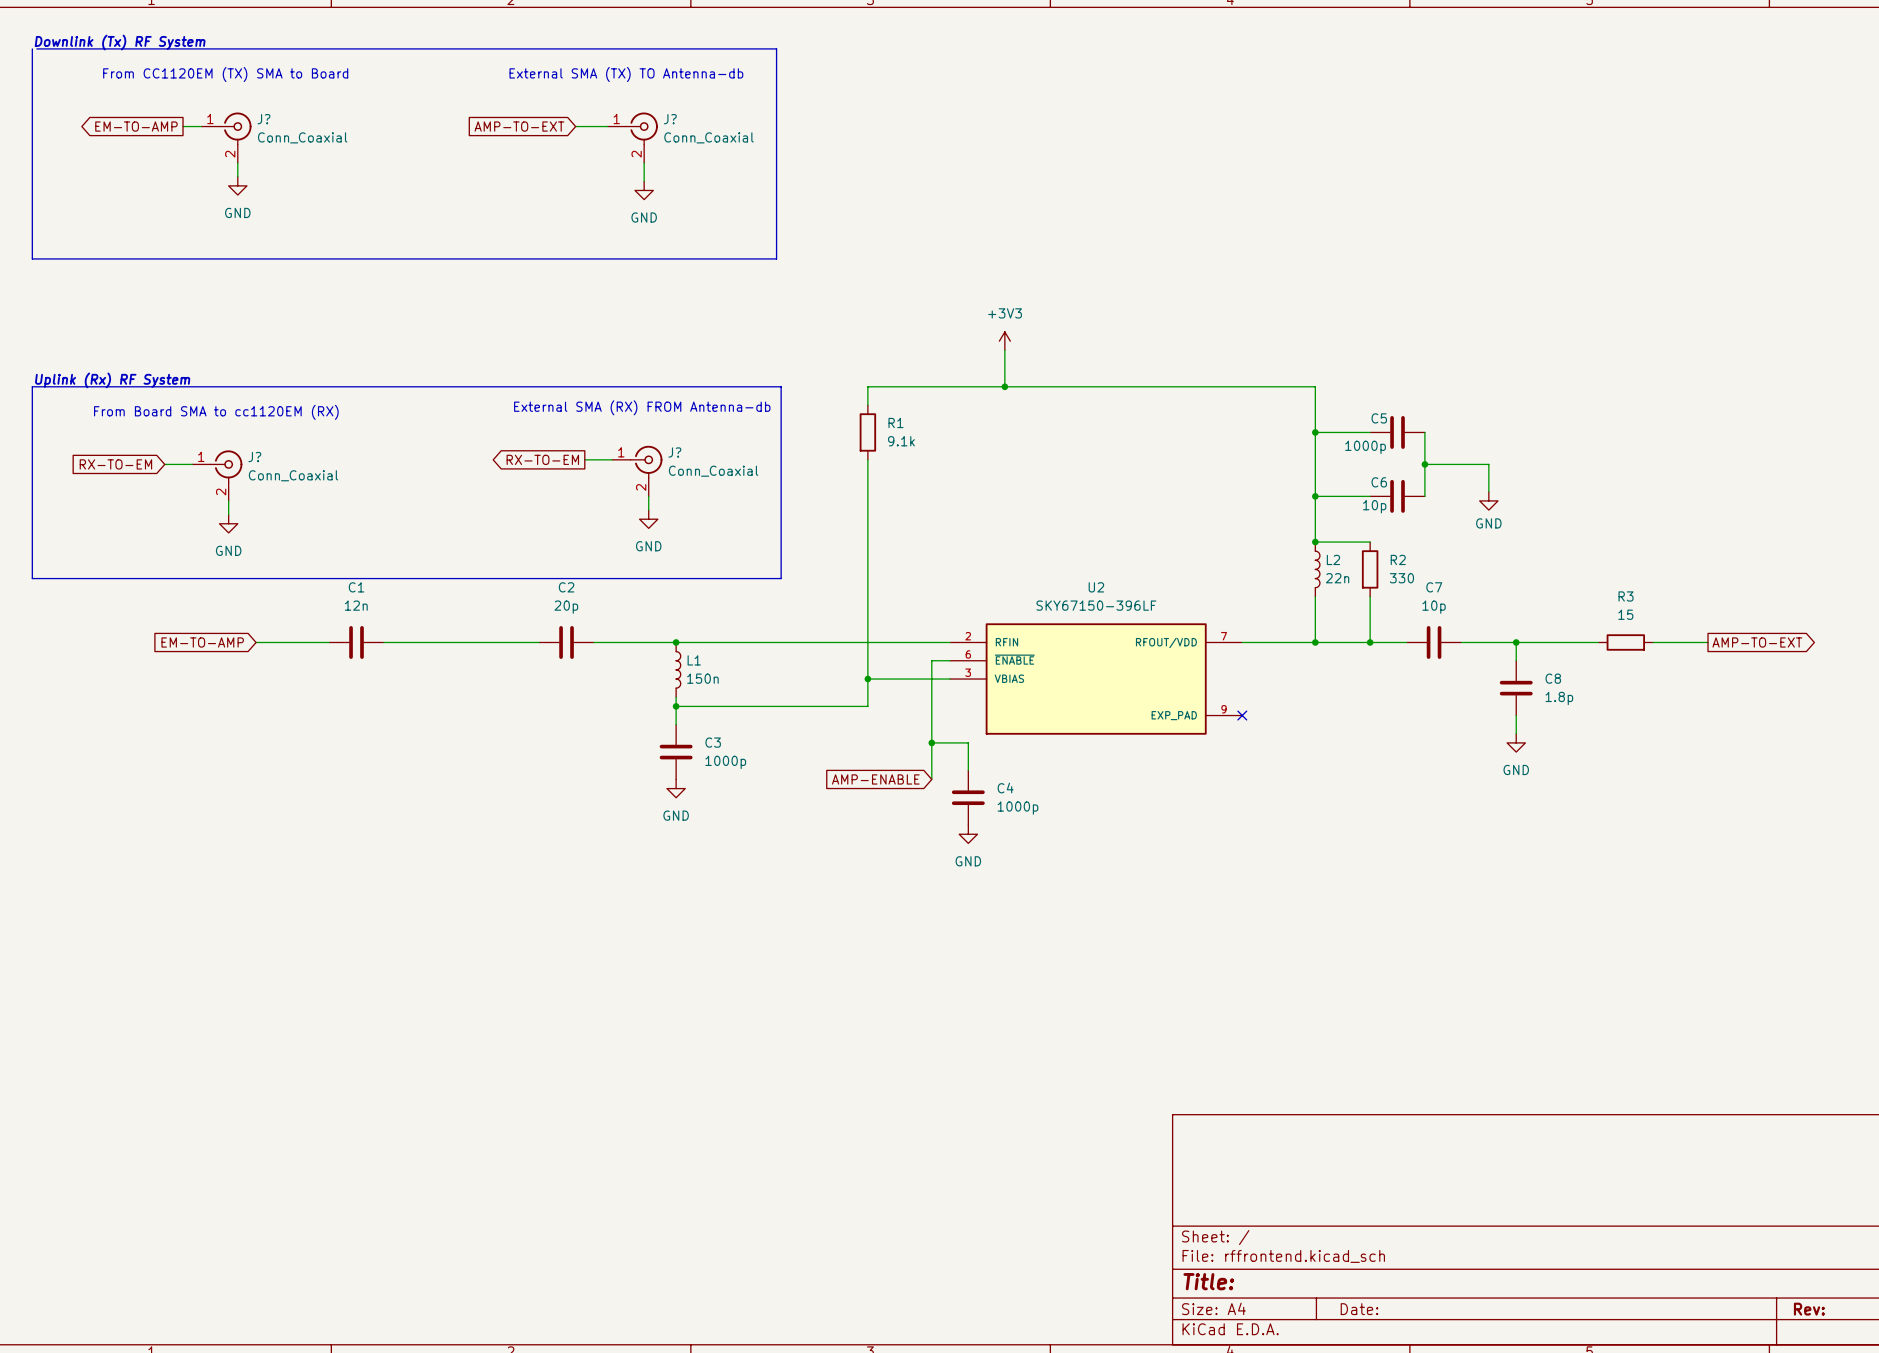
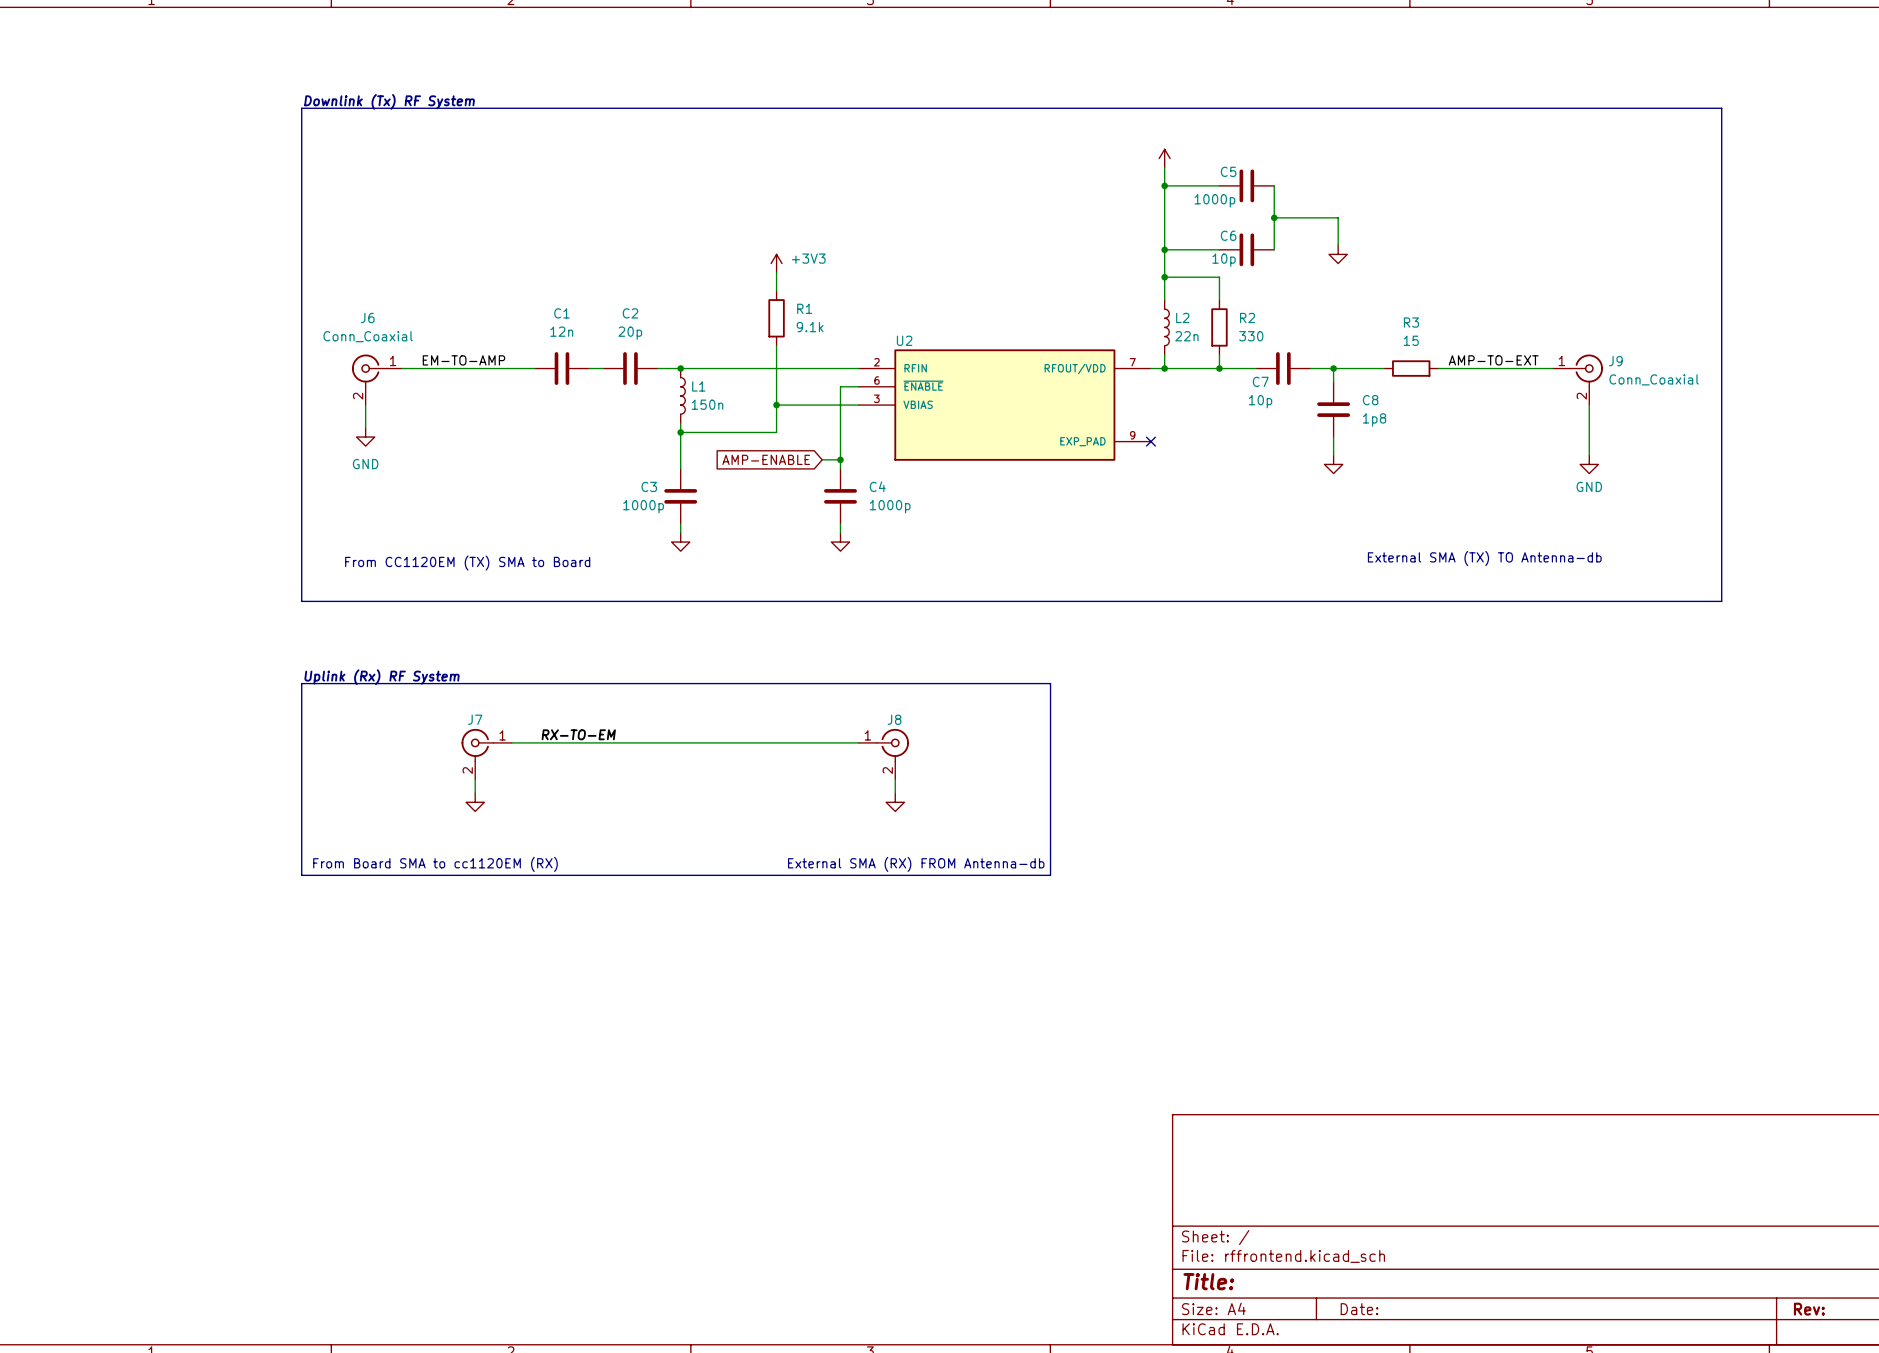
text: Downlink (Tx) RF System (120, 42) -> none
line: (32, 48) (32, 258) (776, 258) (776, 48) (36, 48) -> none
text: From CC1120EM (TX) SMA to Board (225, 74) -> none
text: External SMA (TX) TO Antenna-db (626, 74) -> none
text: none -> Downlink (Tx) RF System (389, 101)
line: none -> (301, 108) (1721, 108) (1721, 601) (301, 601) (301, 108)
global label: EM-TO-AMP (136, 126) -> none
wire: (183, 126) (201, 126) -> none
global label: AMP-TO-EXT (519, 126) -> none
wire: (575, 126) (607, 126) -> none
J?: Conn_Coaxial (226, 137) -> none
J?: Conn_Coaxial (632, 137) -> none
power symbol: none -> (1164, 158)
wire: (237, 163) (237, 176) -> none
wire: (644, 163) (644, 181) -> (776, 272) (776, 290)
wire: none -> (1164, 167) (1164, 300)
power symbol: GND (237, 185) -> none
wire: none -> (1164, 185) (1219, 185)
junction: none -> (1164, 185)
wire: none -> (1274, 185) (1274, 249)
power symbol: GND (644, 190) -> none
wire: none -> (1274, 217) (1338, 217) (1338, 245)
junction: none -> (1274, 217)
wire: none -> (1164, 249) (1219, 249)
junction: none -> (1164, 249)
power symbol: none -> (1338, 254)
power symbol: none -> +3V3 (776, 263)
wire: none -> (1164, 277) (1219, 277) (1219, 300)
junction: none -> (1164, 277)
power symbol: +3V3 (1004, 341) -> none
wire: none -> (776, 345) (776, 432) (680, 432)
wire: none -> (1164, 354) (1164, 368)
wire: none -> (1219, 354) (1219, 368)
label: none -> EM-TO-AMP (463, 360)
label: none -> AMP-TO-EXT (1493, 360)
wire: none -> (402, 368) (534, 368)
wire: none -> (589, 368) (603, 368)
wire: none -> (657, 368) (858, 368)
junction: none -> (680, 368)
wire: none -> (1150, 368) (1255, 368)
junction: none -> (1164, 368)
junction: none -> (1219, 368)
wire: none -> (1310, 368) (1383, 368)
wire: none -> (1333, 368) (1333, 382)
junction: none -> (1333, 368)
wire: none -> (1438, 368) (1552, 368)
J6: none -> Conn_Coaxial (377, 379)
J9: none -> Conn_Coaxial (1577, 379)
text: Uplink (Rx) RF System (112, 380) -> none
line: (32, 386) (781, 386) (781, 578) (32, 578) (32, 386) -> none
wire: none -> (858, 386) (840, 386) (840, 468)
junction: (1004, 386) -> none
wire: none -> (365, 405) (365, 427)
wire: none -> (776, 405) (858, 405)
junction: none -> (776, 405)
wire: (867, 405) (867, 386) (1315, 386) (1315, 542) (1370, 542) -> none
wire: none -> (1589, 405) (1589, 455)
text: External SMA (RX) FROM Antenna-db (642, 407) -> none
text: From Board SMA to cc1120EM (RX) (216, 412) -> none
wire: none -> (680, 423) (680, 468)
junction: none -> (680, 432)
R1 position: (867, 432) -> (776, 318)
wire: (1315, 432) (1370, 432) -> none
junction: (1315, 432) -> none
C5 position: (1397, 432) -> (1246, 185)
wire: (1424, 432) (1424, 496) -> none
power symbol: none -> GND (365, 437)
wire: none -> (1333, 437) (1333, 455)
no-connect mark: none -> (1150, 441)
global label: RX-TO-EM (542, 459) -> none
wire: (584, 459) (612, 459) -> none
global label: none -> AMP-ENABLE (766, 459)
wire: none -> (822, 459) (840, 459)
junction: none -> (840, 459)
wire: (867, 459) (867, 706) (676, 706) -> none
global label: RX-TO-EM (115, 464) -> none
wire: (164, 464) (192, 464) -> none
power symbol: none -> (1333, 464)
wire: (1424, 464) (1488, 464) (1488, 491) -> none
junction: (1424, 464) -> none
J?: Conn_Coaxial (637, 471) -> none
J?: Conn_Coaxial (217, 475) -> none
wire: (648, 496) (648, 510) -> none
wire: (1315, 496) (1370, 496) -> none
junction: (1315, 496) -> none
C6 position: (1397, 496) -> (1246, 249)
wire: (228, 500) (228, 514) -> none
power symbol position: GND (1488, 500) -> GND (1589, 464)
power symbol: GND (648, 519) -> none
power symbol: GND (228, 523) -> none
wire: none -> (680, 523) (680, 532)
wire: none -> (840, 523) (840, 532)
power symbol: none -> (680, 542)
power symbol: none -> (840, 542)
junction: (1315, 542) -> none
text: none -> External SMA (TX) TO Antenna-db (1484, 558)
text: none -> From CC1120EM (TX) SMA to Board (467, 563)
L2 position: (1317, 569) -> (1166, 327)
R2 position: (1370, 569) -> (1219, 327)
U2 name position: U2 (1096, 587) -> U2 (904, 340)
C7 name position: C7 (1434, 587) -> C7 (1260, 381)
wire: (1315, 596) (1315, 642) -> none
wire: (1370, 596) (1370, 642) -> none
U2 value: SKY67150-396LF (1096, 605) -> none
C7 value position: 10p (1434, 607) -> 10p (1260, 401)
global label: EM-TO-AMP (202, 642) -> none
wire: (256, 642) (329, 642) -> none
C1 position: (356, 642) -> (561, 368)
wire: (383, 642) (539, 642) -> none
C2 position: (566, 642) -> (630, 368)
wire: (593, 642) (950, 642) -> none
junction: (676, 642) -> none
wire: (1242, 642) (1406, 642) -> none
junction: (1315, 642) -> none
junction: (1370, 642) -> none
C7 position: (1434, 642) -> (1283, 368)
wire: (1461, 642) (1598, 642) -> none
wire: (1516, 642) (1516, 660) -> none
junction: (1516, 642) -> none
R3 position: (1625, 642) -> (1411, 368)
wire: (1653, 642) (1708, 642) -> none
global label: AMP-TO-EXT (1757, 642) -> none
wire: (950, 660) (931, 660) (931, 779) -> none
L1 position: (678, 669) -> (682, 395)
text: none -> Uplink (Rx) RF System (382, 677)
wire: (867, 679) (950, 679) -> none
junction: (867, 679) -> none
U2 position: (1096, 679) -> (1004, 405)
line: none -> (301, 683) (1050, 683) (1050, 875) (301, 875) (301, 683)
C8 position: (1516, 688) -> (1333, 409)
wire: (676, 697) (676, 724) -> none
C8 value: 1.8p (1559, 698) -> 1p8 (1374, 419)
junction: (676, 706) -> none
no-connect mark: (1242, 715) -> none
wire: (1516, 715) (1516, 733) -> none
label: none -> RX-TO-EM (578, 734)
wire: none -> (511, 742) (858, 742)
C3 name position: C3 (713, 742) -> C3 (649, 486)
wire: (931, 742) (968, 742) (968, 770) -> none
junction: (931, 742) -> none
power symbol: GND (1516, 742) -> none
C3 position: (676, 752) -> (680, 496)
J7: none -> (486, 754)
J8: none -> (883, 754)
C3 value position: 1000p (725, 762) -> 1000p (643, 506)
wire: none -> (475, 779) (475, 793)
global label: AMP-ENABLE (875, 779) -> none
wire: none -> (895, 779) (895, 793)
power symbol: GND (676, 788) -> none
C4 position: (968, 797) -> (840, 496)
power symbol: none -> (475, 802)
power symbol: none -> (895, 802)
power symbol: GND (968, 834) -> none
text: none -> From Board SMA to cc1120EM (RX) (435, 864)
text: none -> External SMA (RX) FROM Antenna-db (916, 864)

